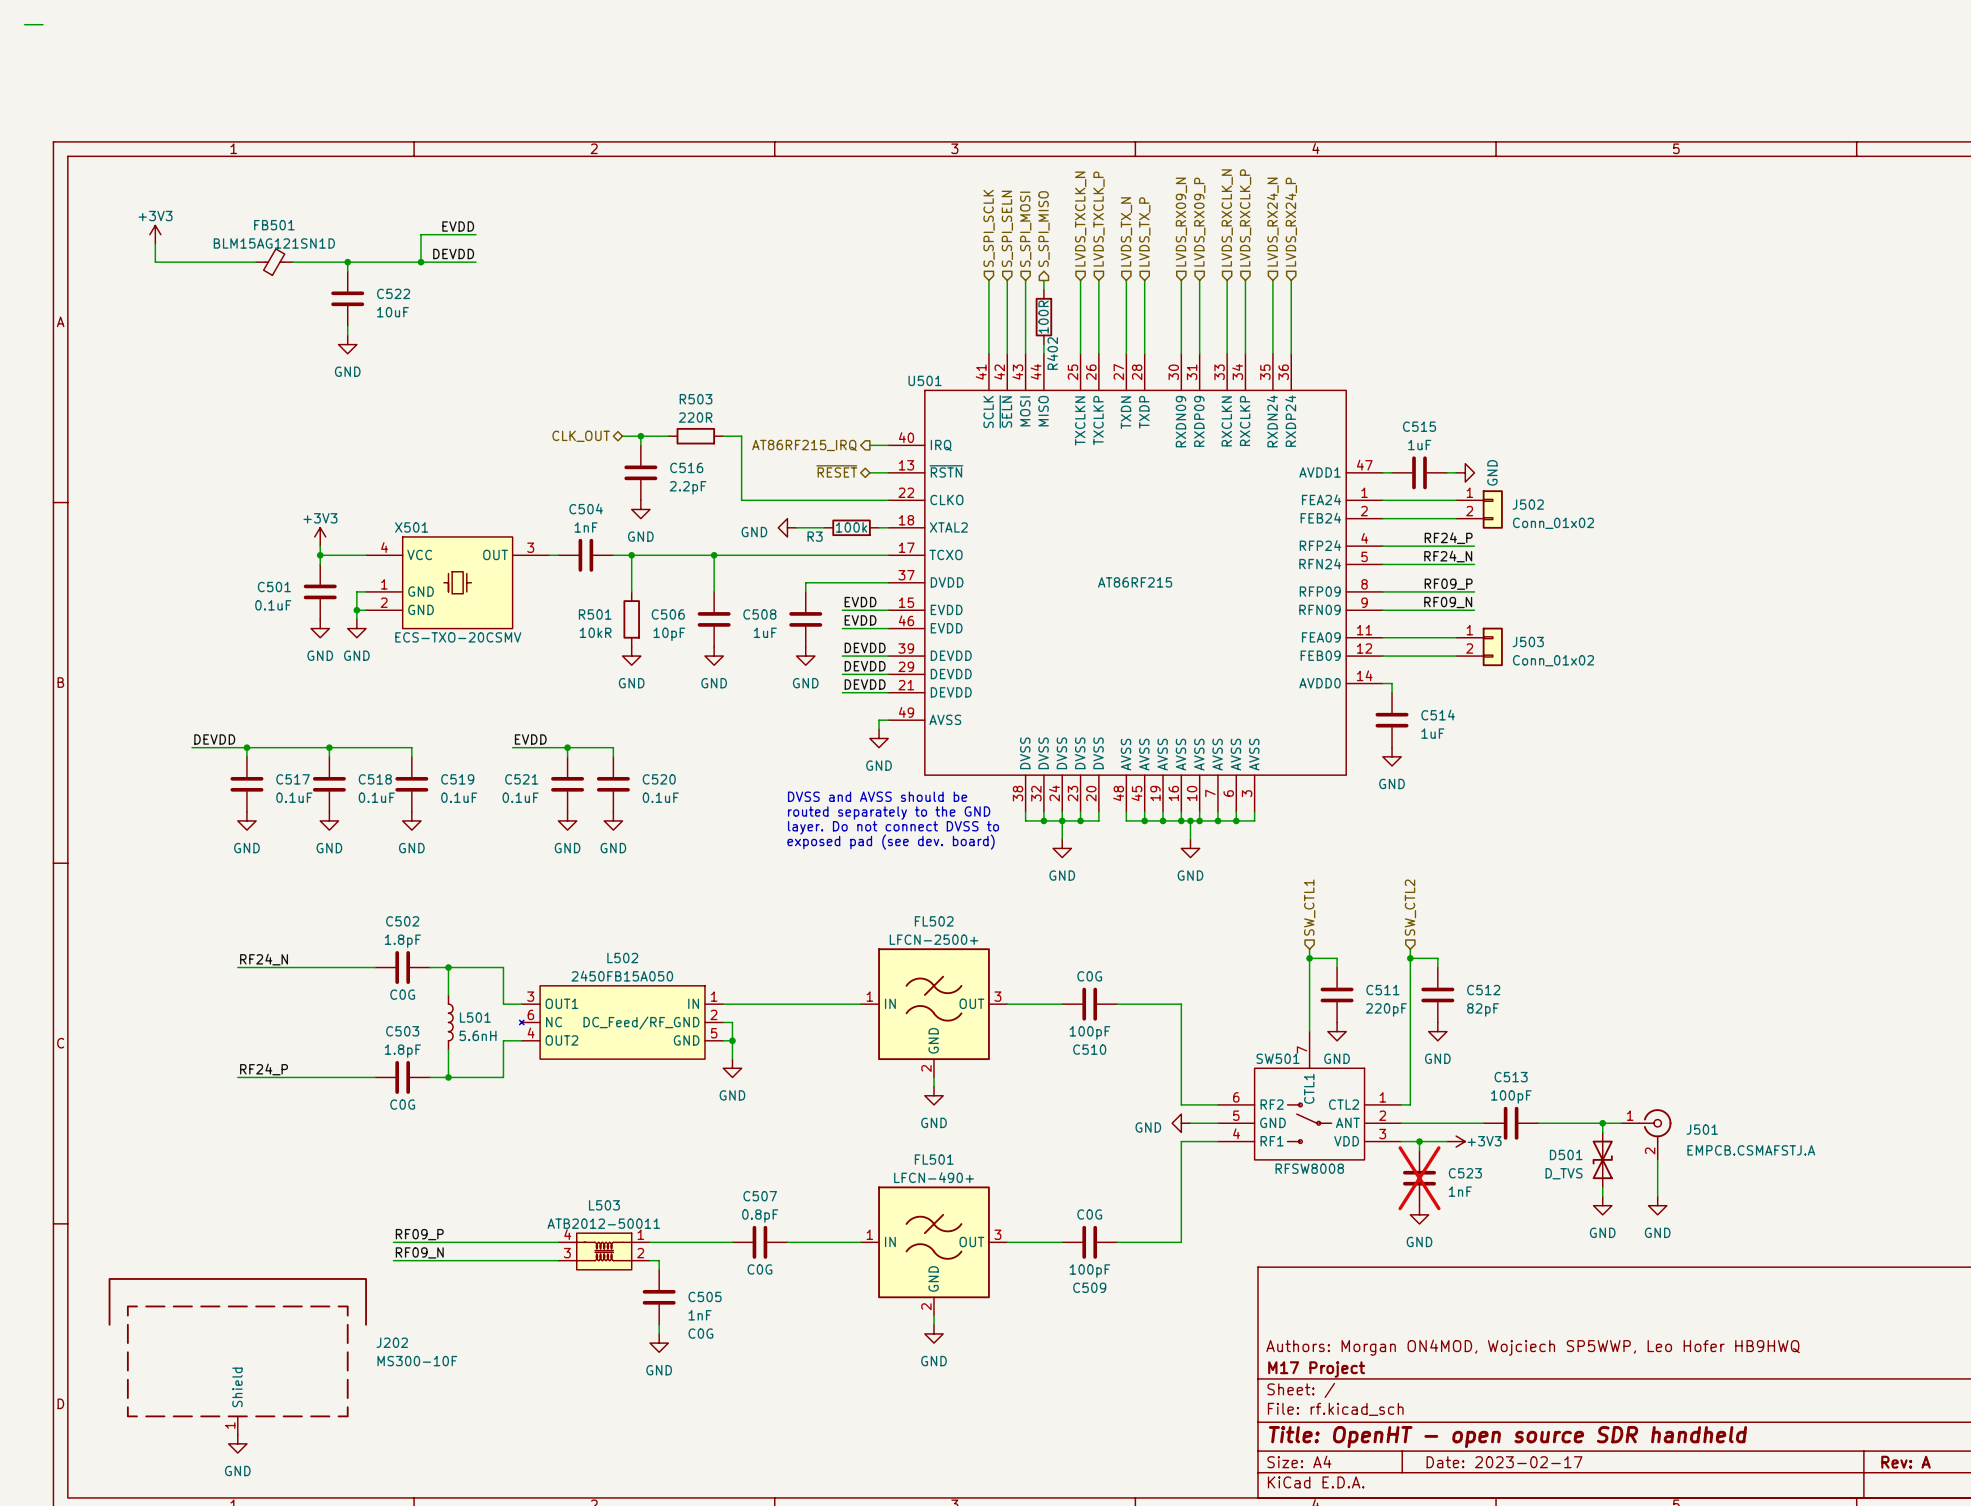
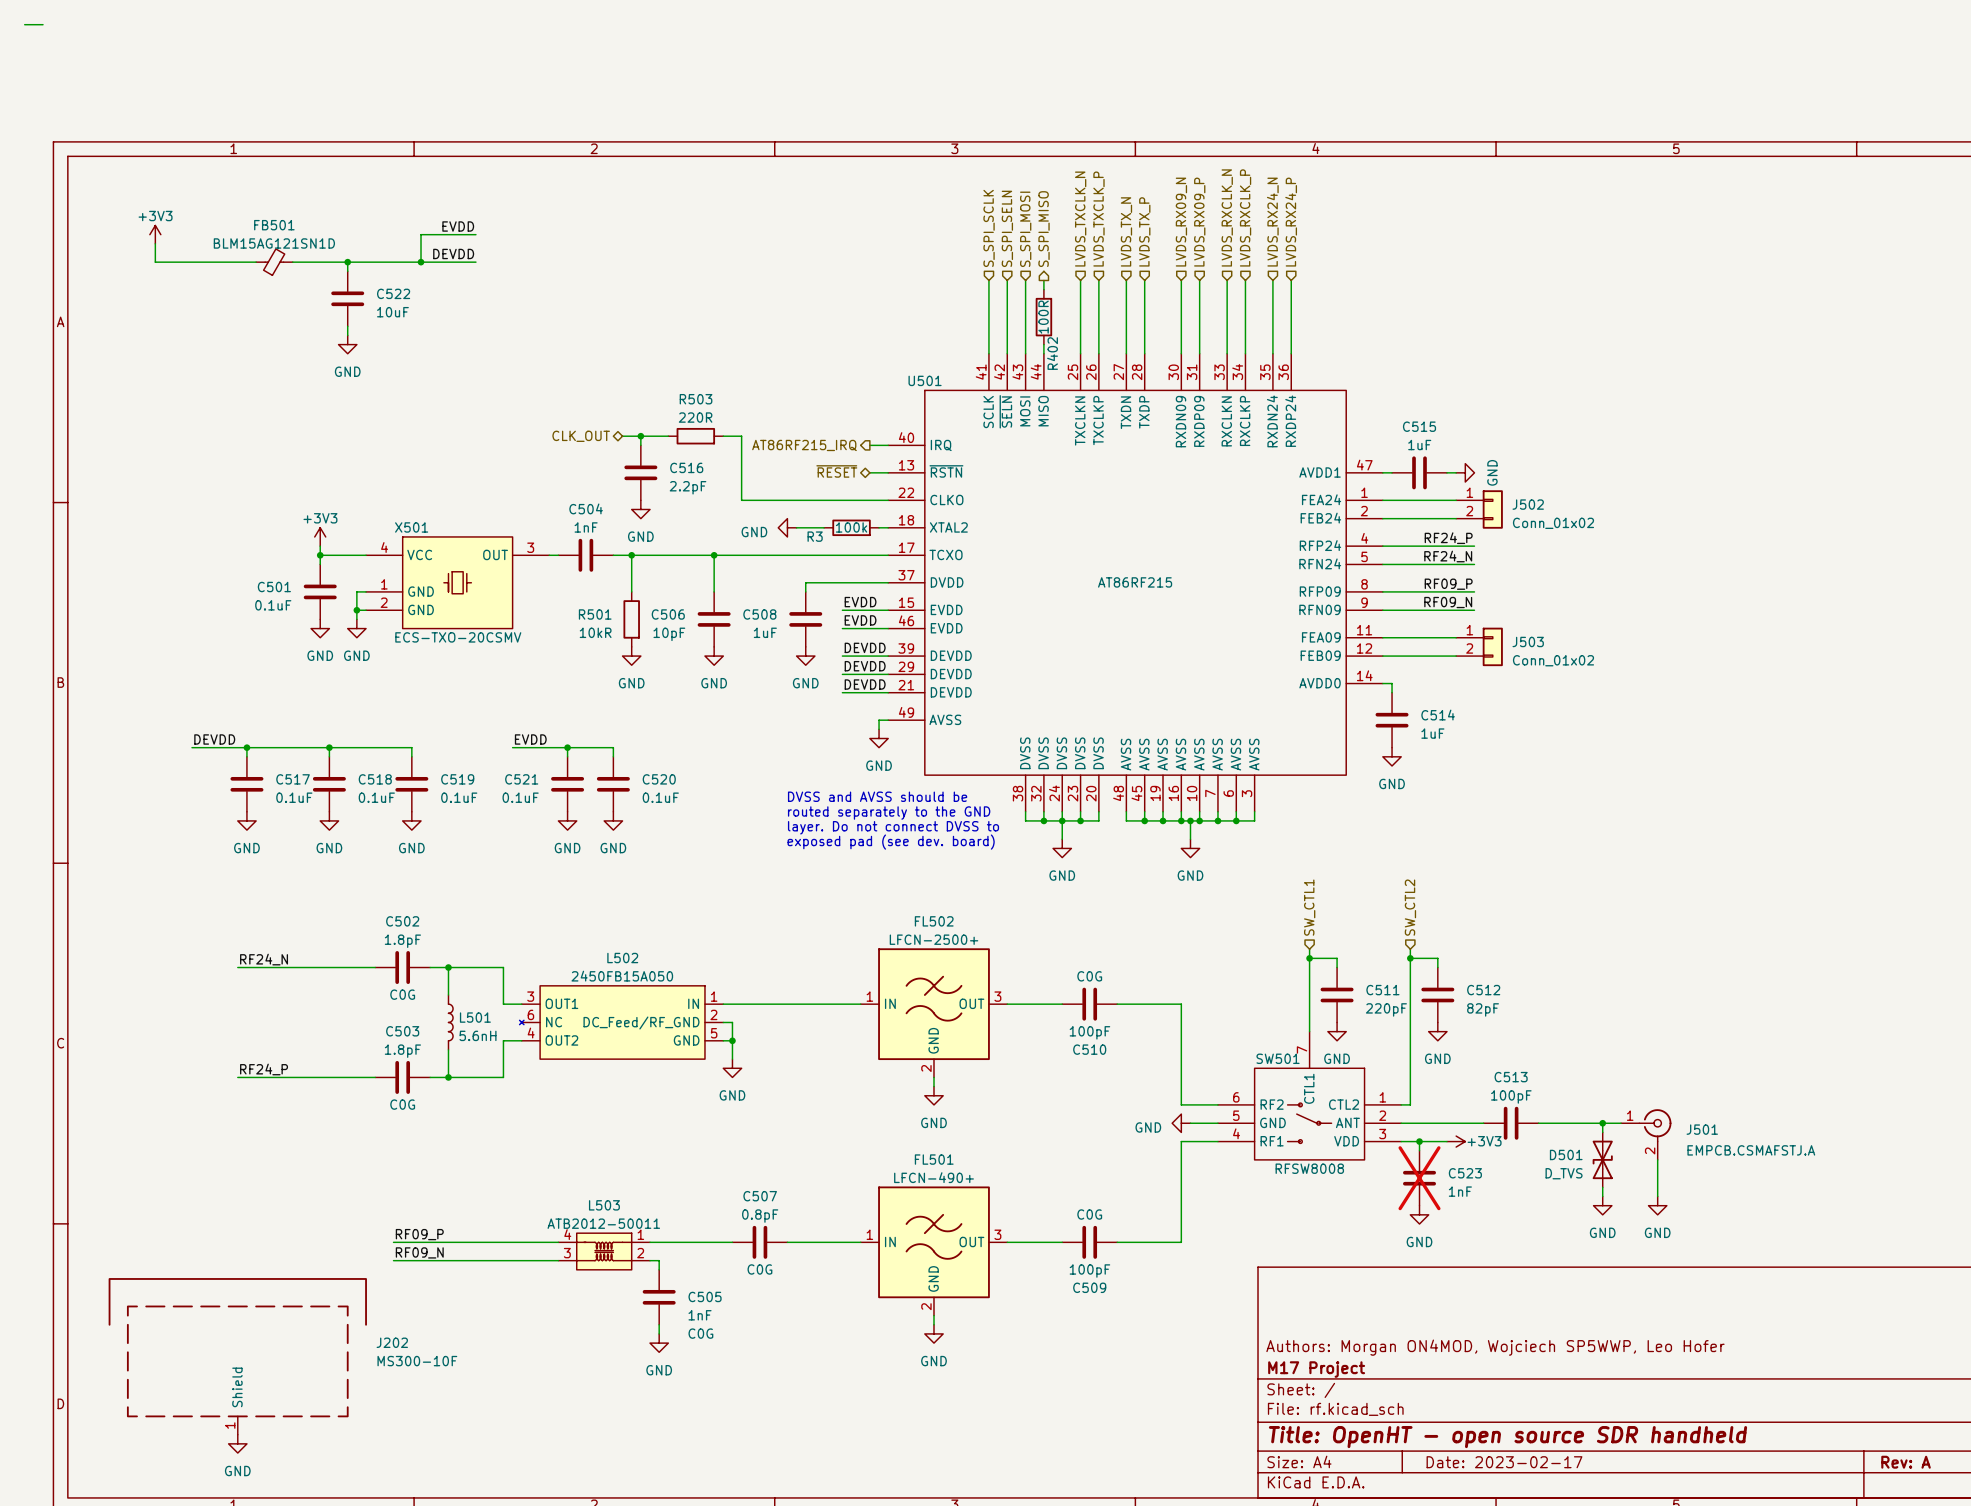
title block: Authors: Morgan ON4MOD, Wojciech SP5WWP, Leo Hofer HB9HWQ (1533, 1347) -> Authors: Morgan ON4MOD, Wojciech SP5WWP, Leo Hofer (1495, 1347)

